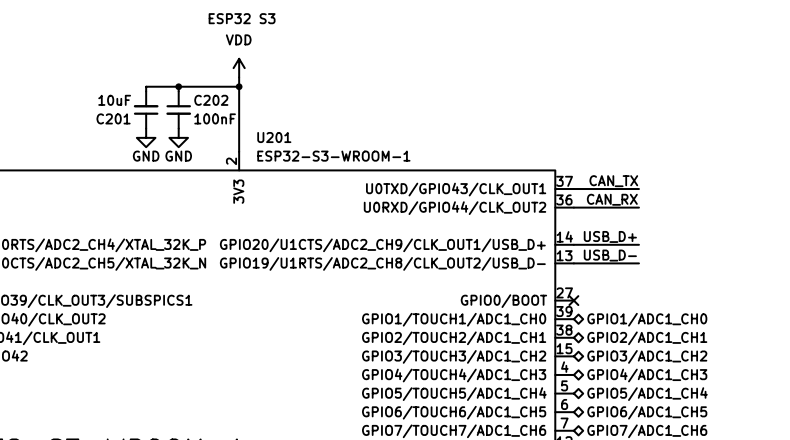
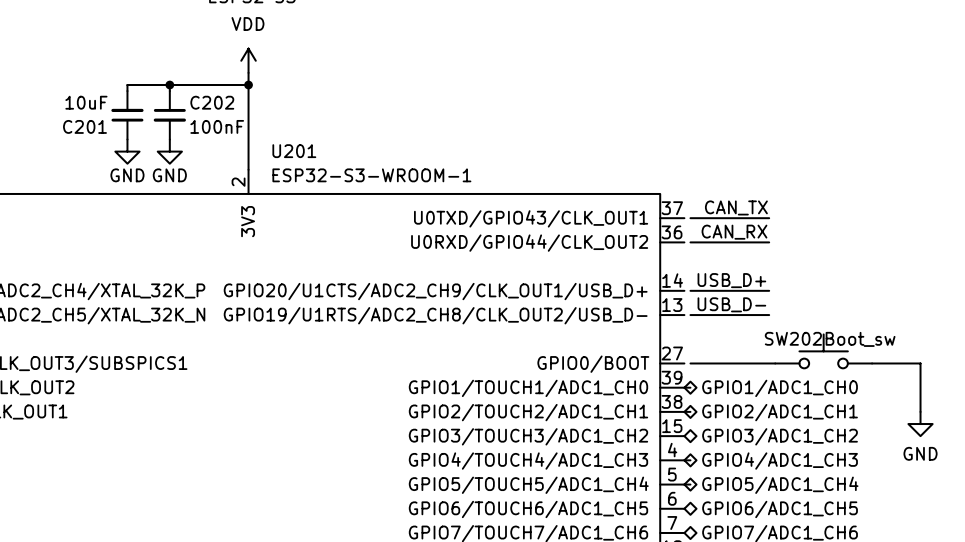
wire: (573, 189) (578, 189) -> (684, 387) (690, 387)
wire: (573, 207) (578, 207) -> (684, 411) (690, 411)
wire: (573, 244) (578, 244) -> (684, 460) (690, 460)
wire: (573, 263) (578, 263) -> (684, 484) (690, 484)
SW202: none -> Boot_sw (823, 351)
no-connect mark: (573, 300) -> none
wire: none -> (690, 363) (775, 363)
wire: none -> (872, 363) (920, 363) (920, 411)
power symbol: none -> GND (920, 424)

